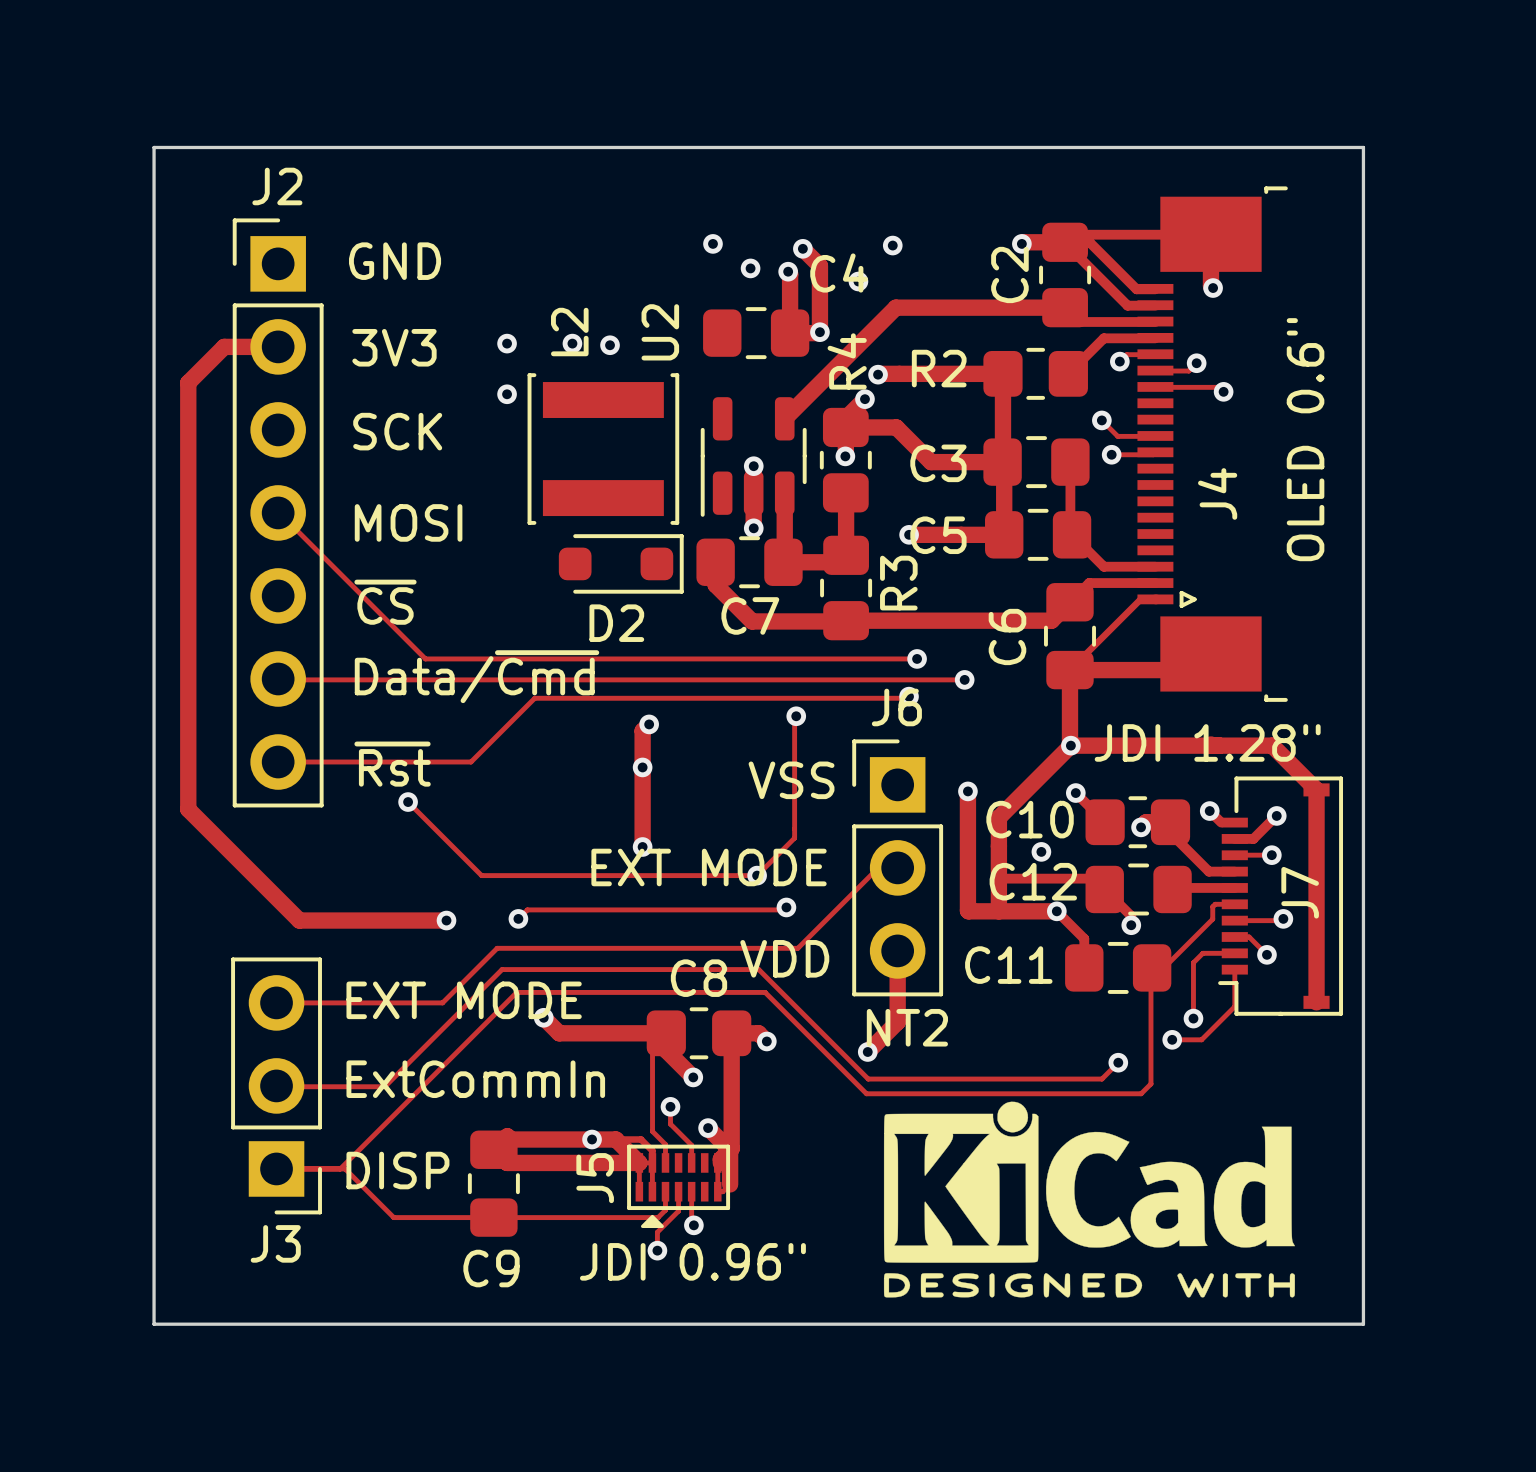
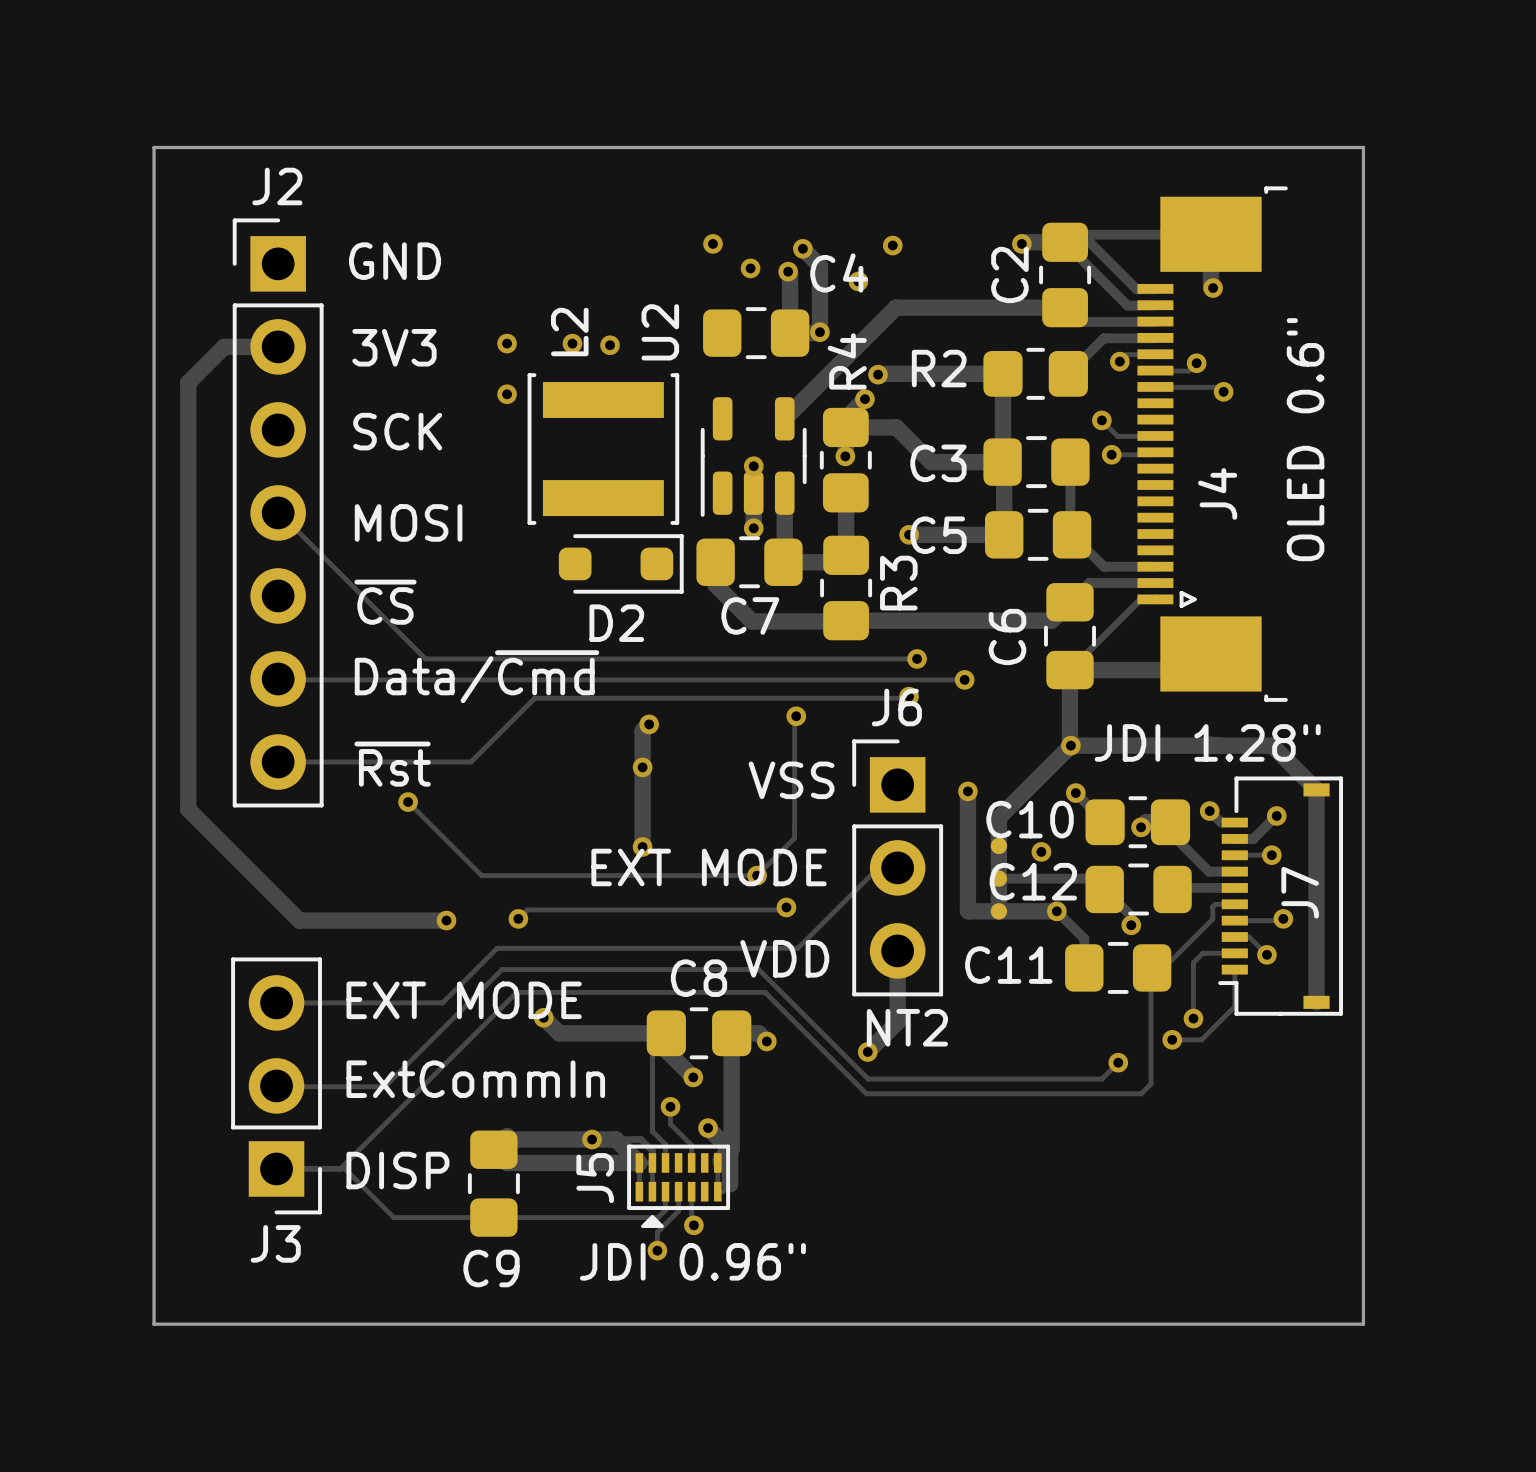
drawing: [883, 1101, 1295, 1298] -> none

